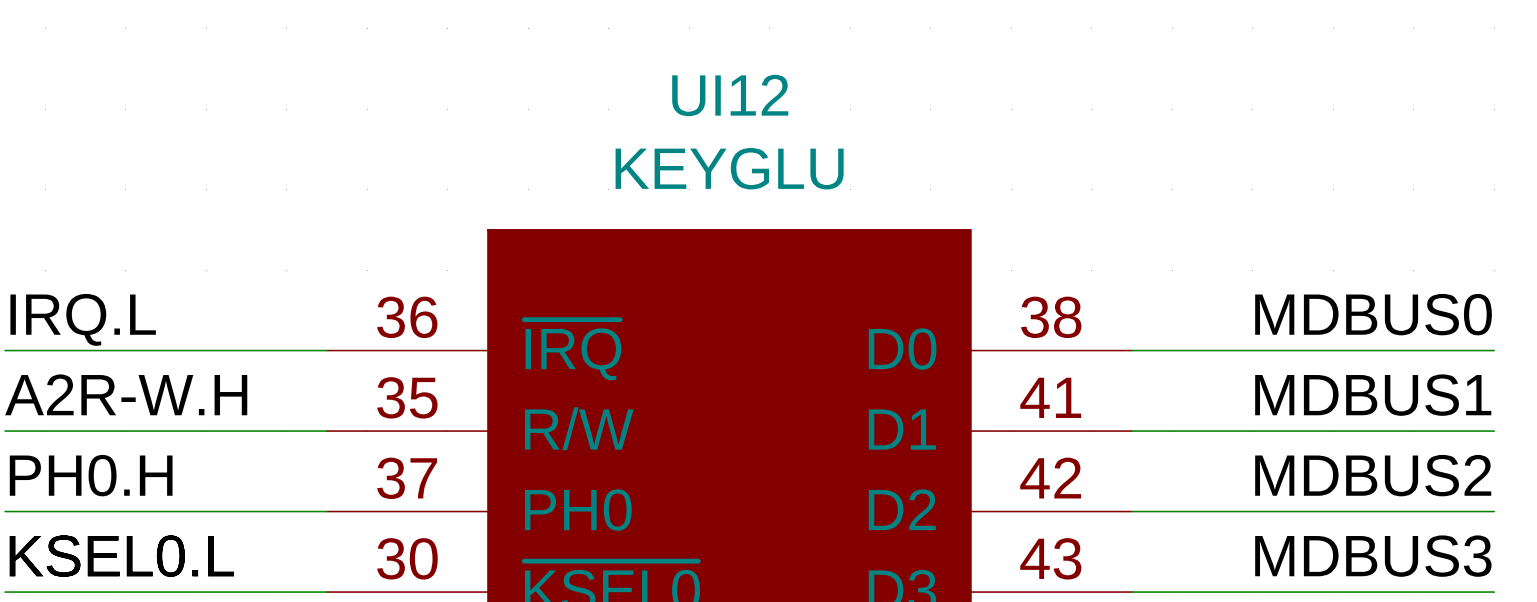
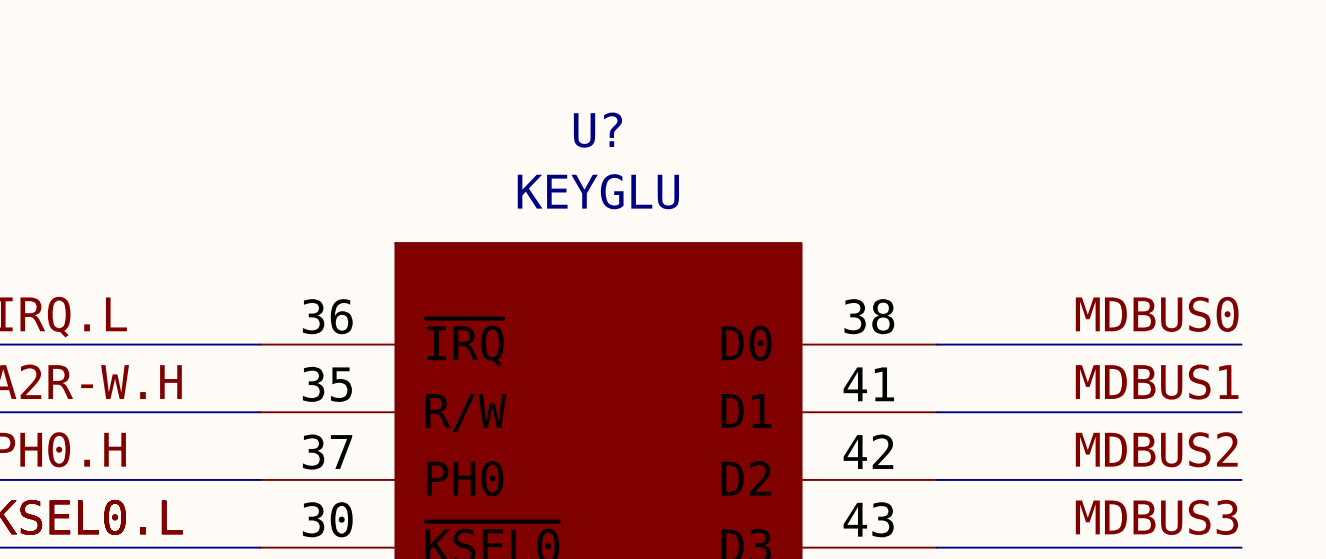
UI12 name: UI12 (730, 95) -> U? (597, 130)

